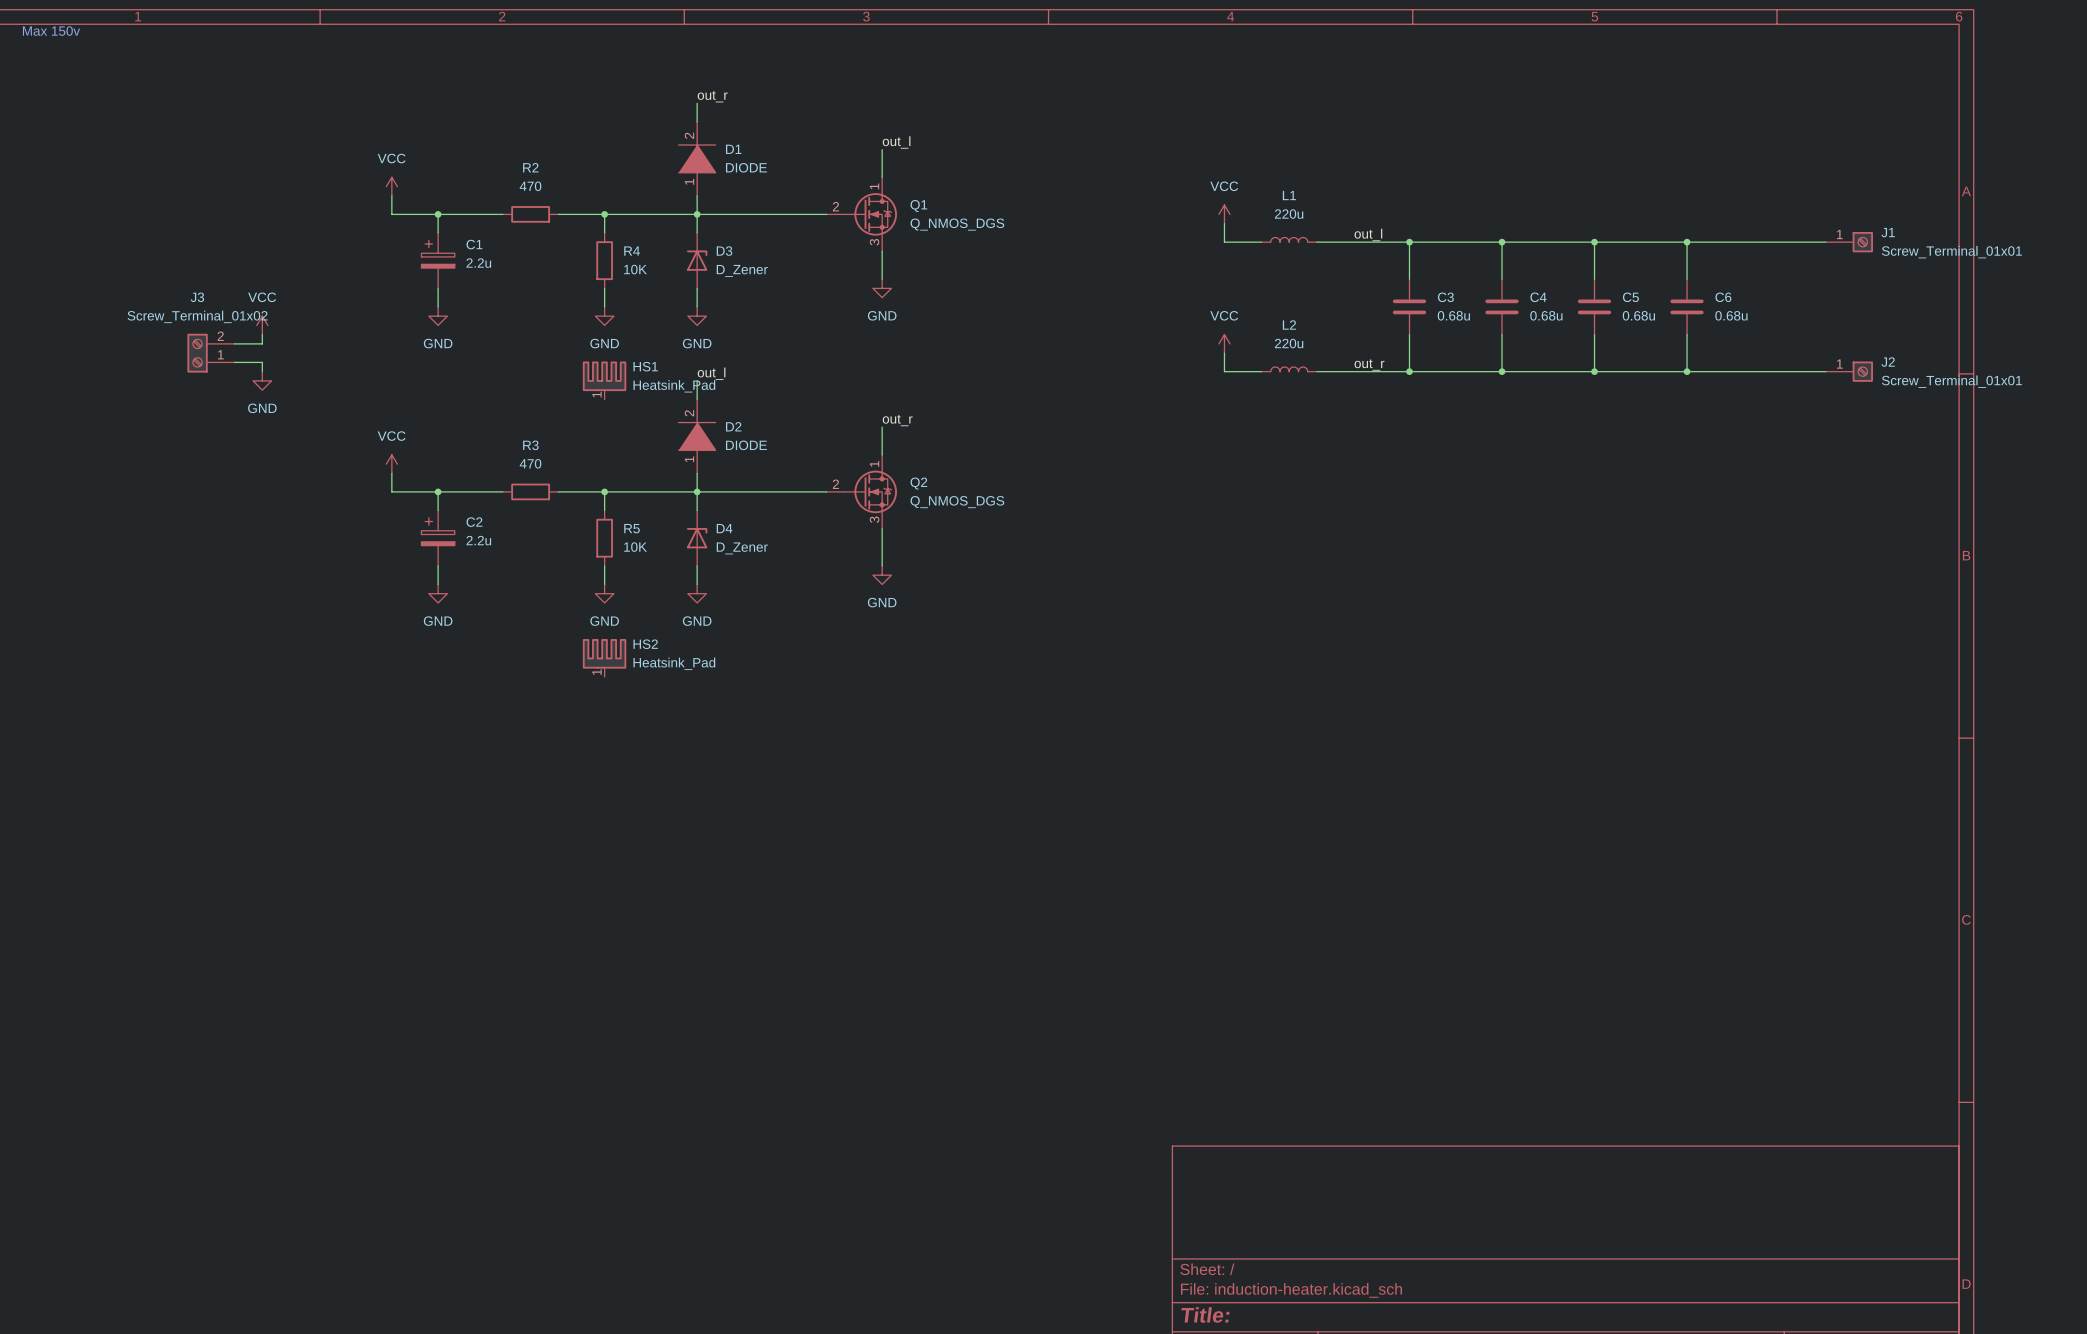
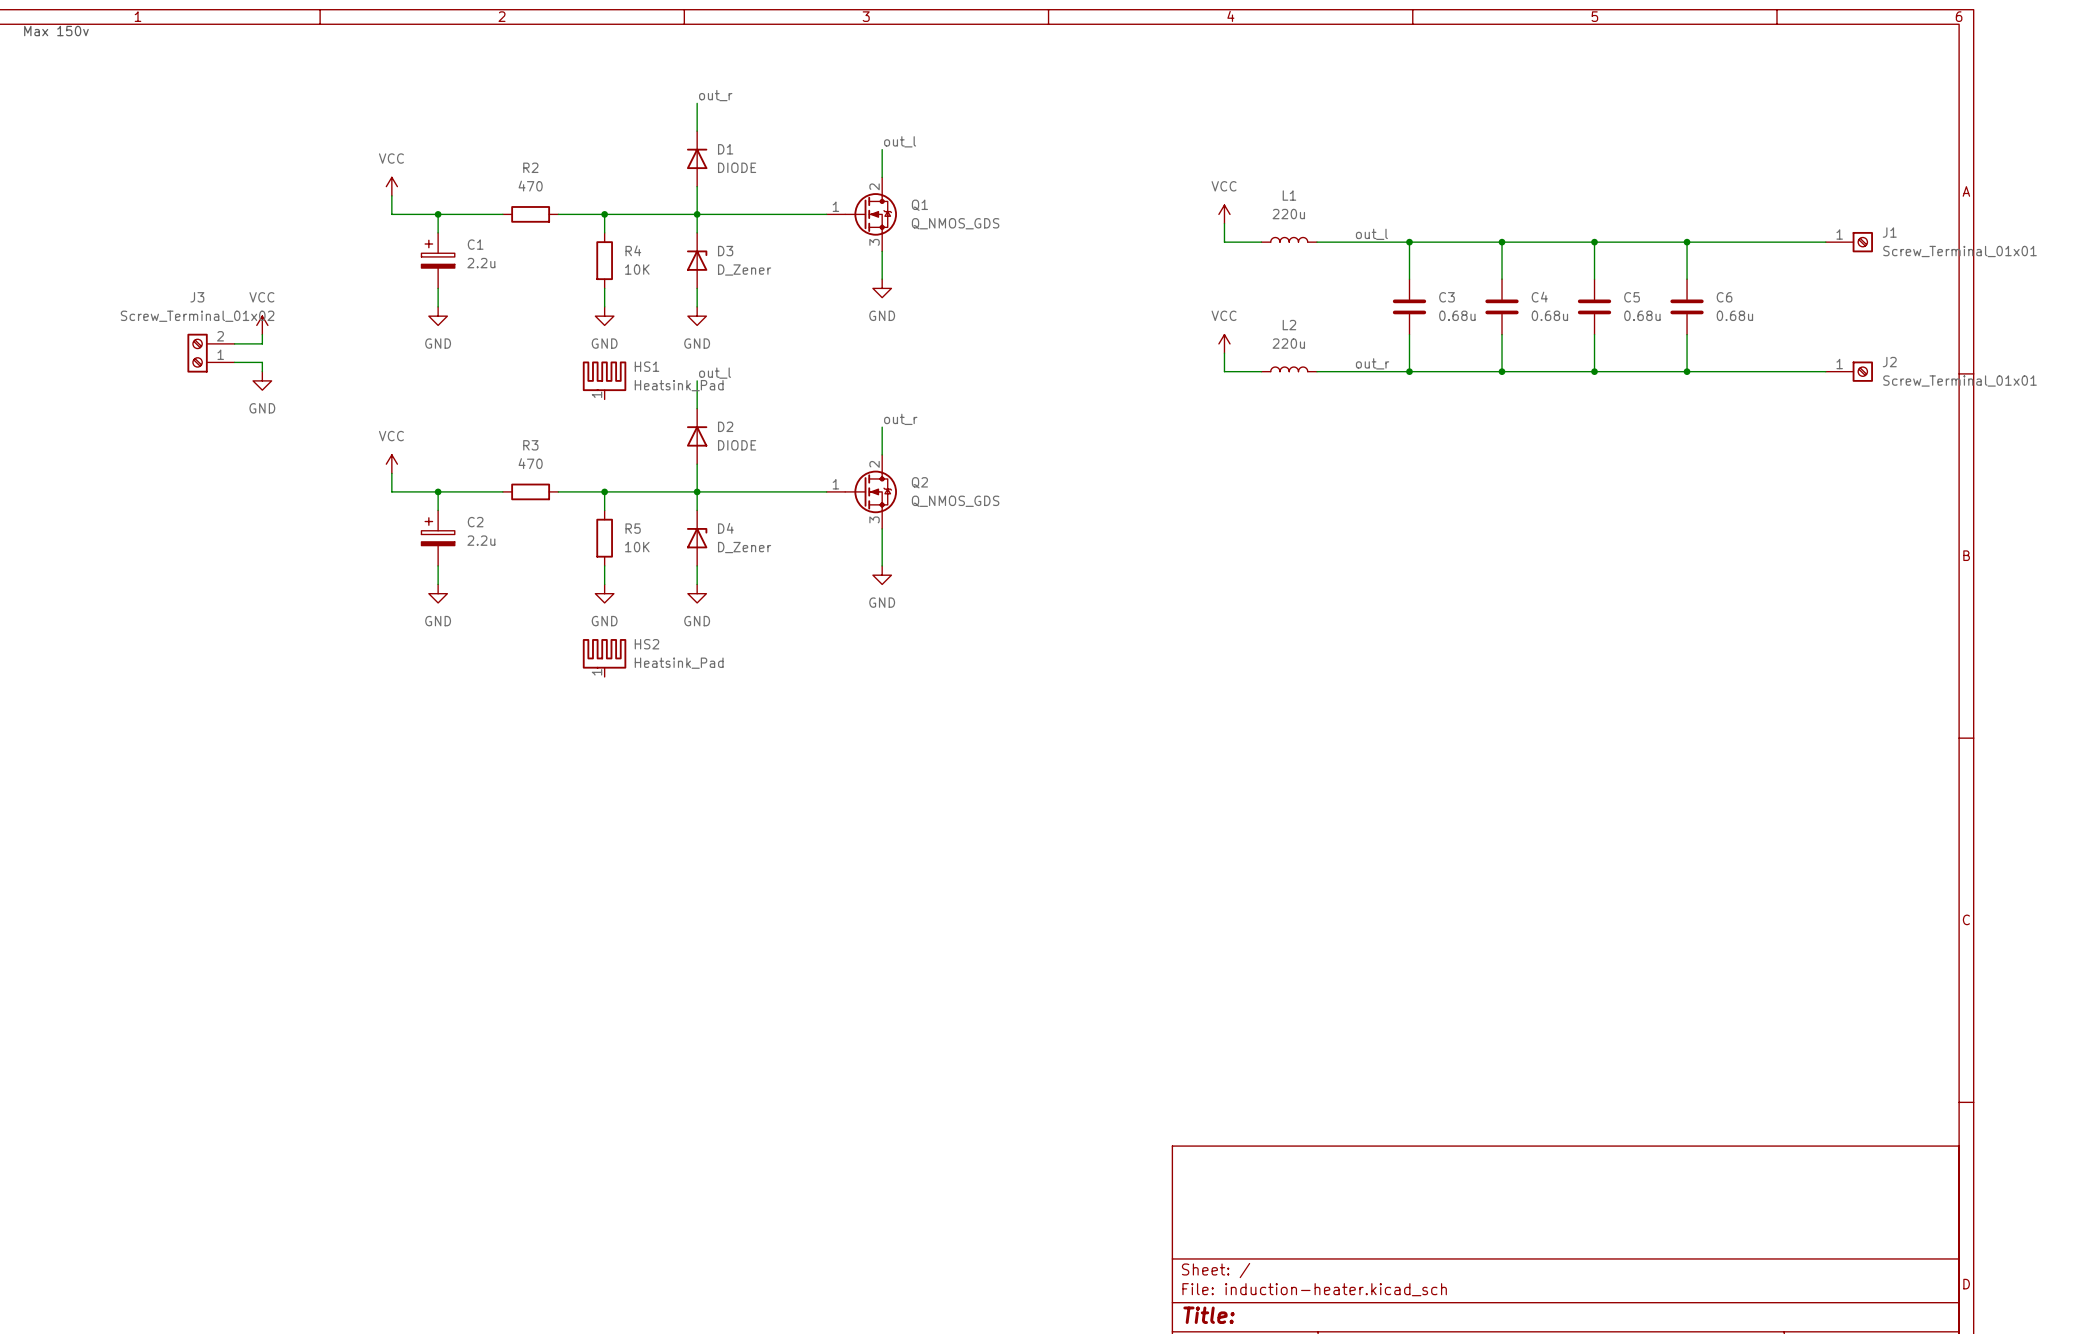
D1 symbol: [678, 121, 716, 196] -> [686, 131, 708, 187]
Q1 pin number: 1 (874, 186) -> 2 (874, 186)
Q1 pin number: 2 (835, 206) -> 1 (835, 206)
Q1 value: Q_NMOS_DGS (957, 224) -> Q_NMOS_GDS (955, 223)
D2 symbol: [678, 399, 716, 474] -> [686, 408, 708, 465]
Q2 pin number: 1 (874, 463) -> 2 (874, 464)
Q2 pin number: 2 (835, 484) -> 1 (835, 484)
Q2 value: Q_NMOS_DGS (957, 502) -> Q_NMOS_GDS (955, 501)

